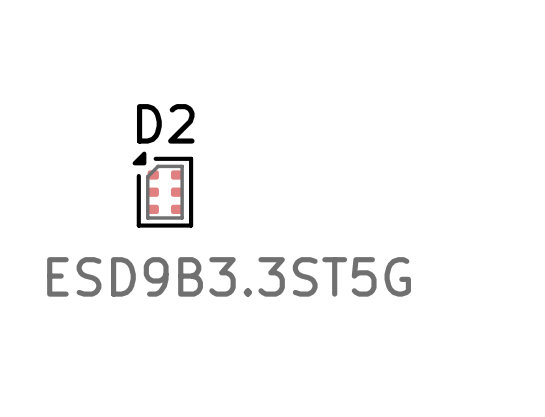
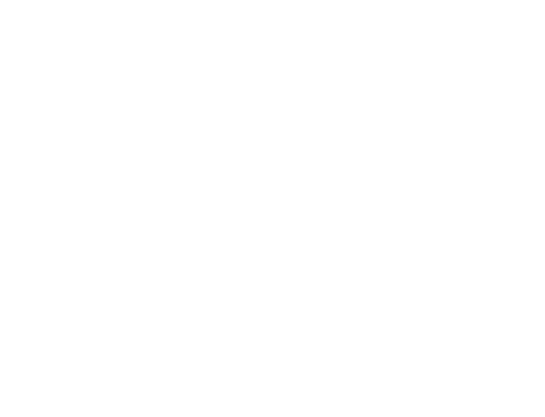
D2: ESD9B3.3ST5G (162, 189) -> none

